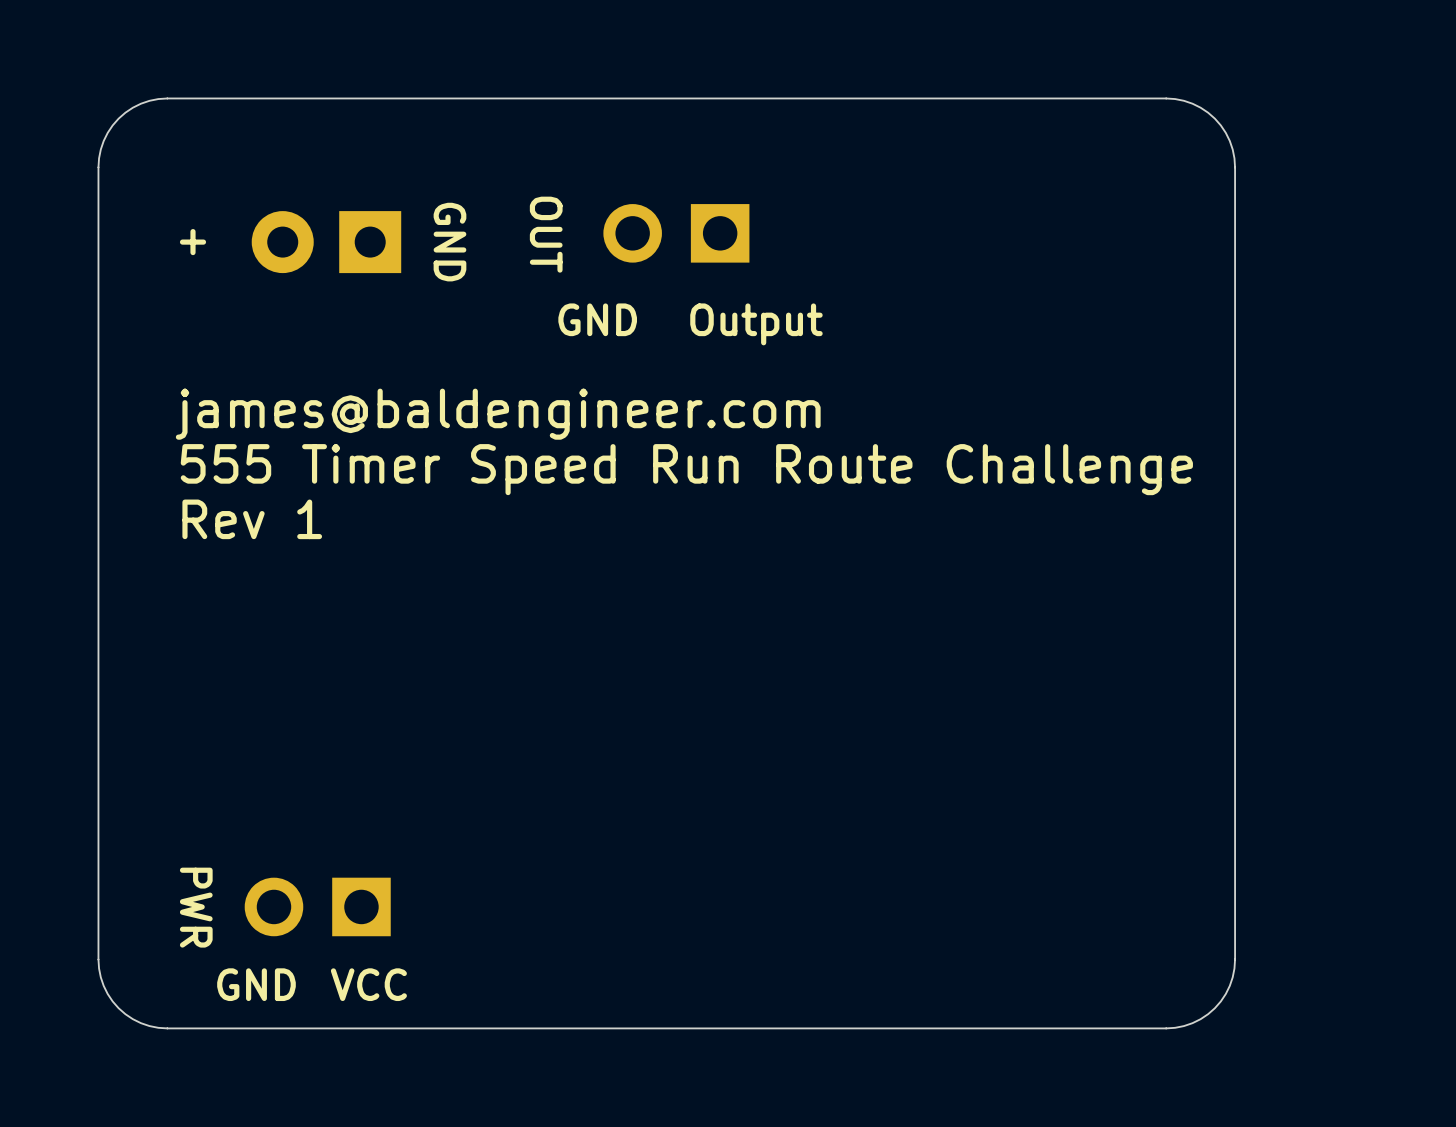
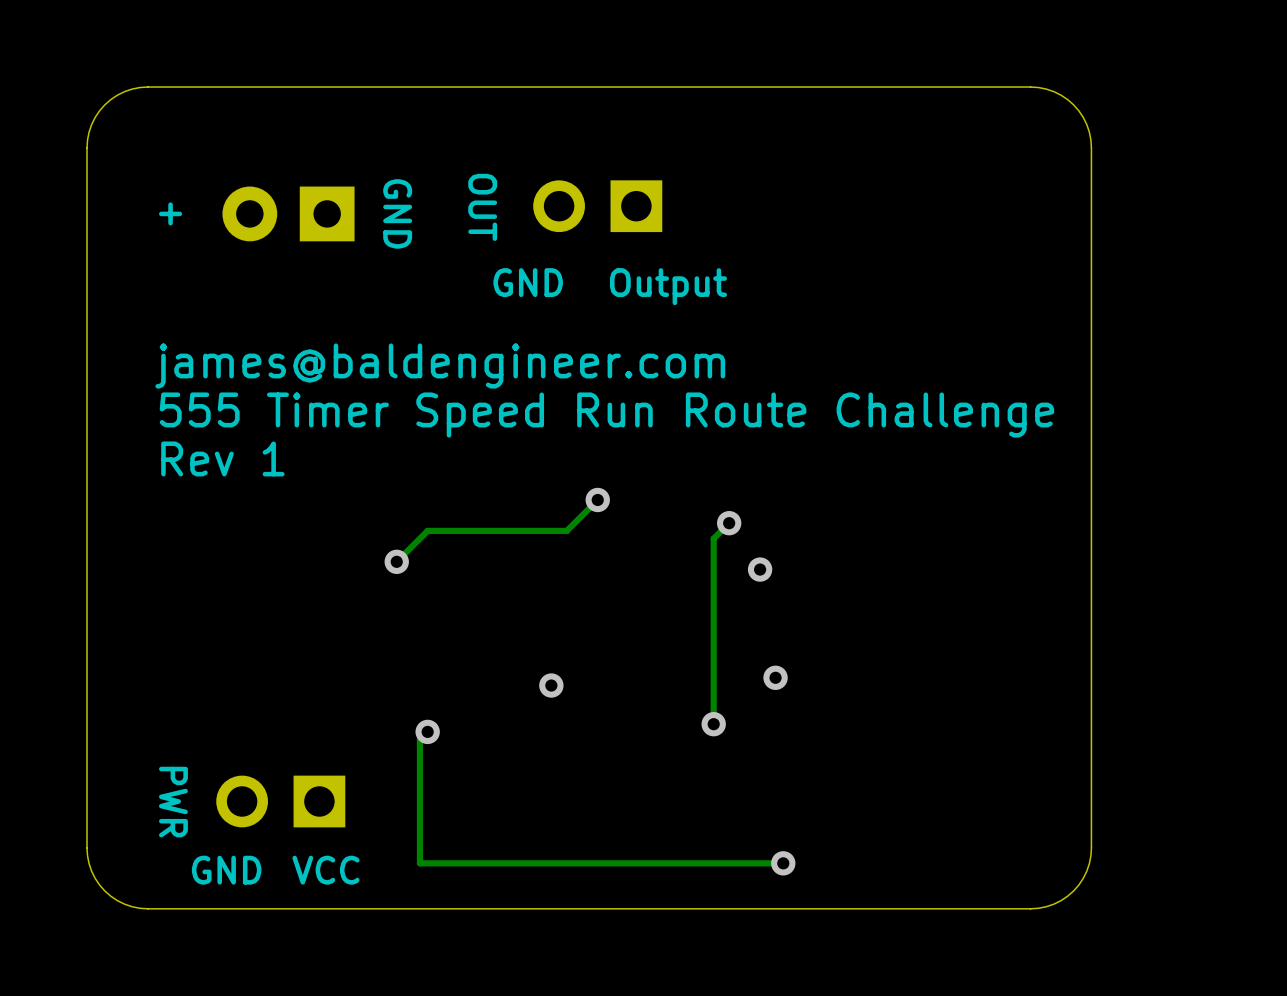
track: none -> (597, 499) (566, 530) (427, 530) (396, 561)
via: none -> (597, 499)
track: none -> (729, 523) (713, 538) (713, 724)
via: none -> (729, 523)
via: none -> (396, 561)
via: none -> (760, 569)
via: none -> (775, 677)
via: none -> (551, 685)
via: none -> (713, 724)
track: none -> (427, 731) (419, 739) (419, 863) (783, 863)
via: none -> (427, 731)
via: none -> (783, 863)

